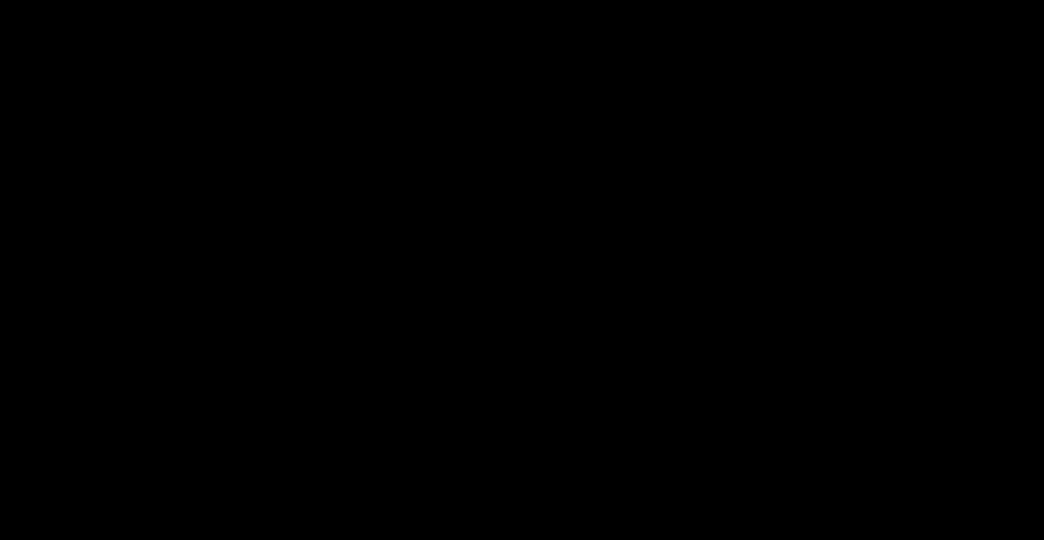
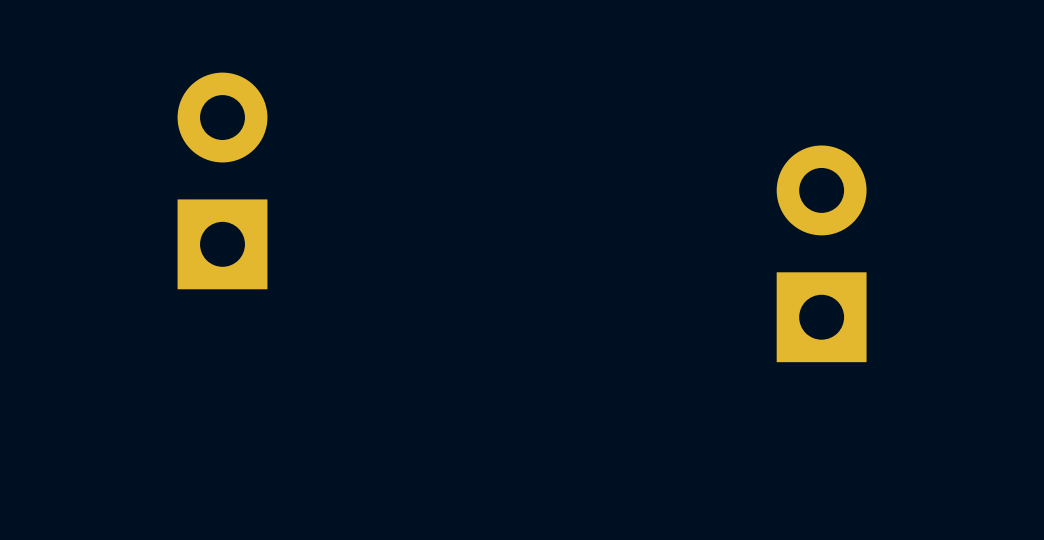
part: none -> (222, 180)
part: none -> (821, 253)

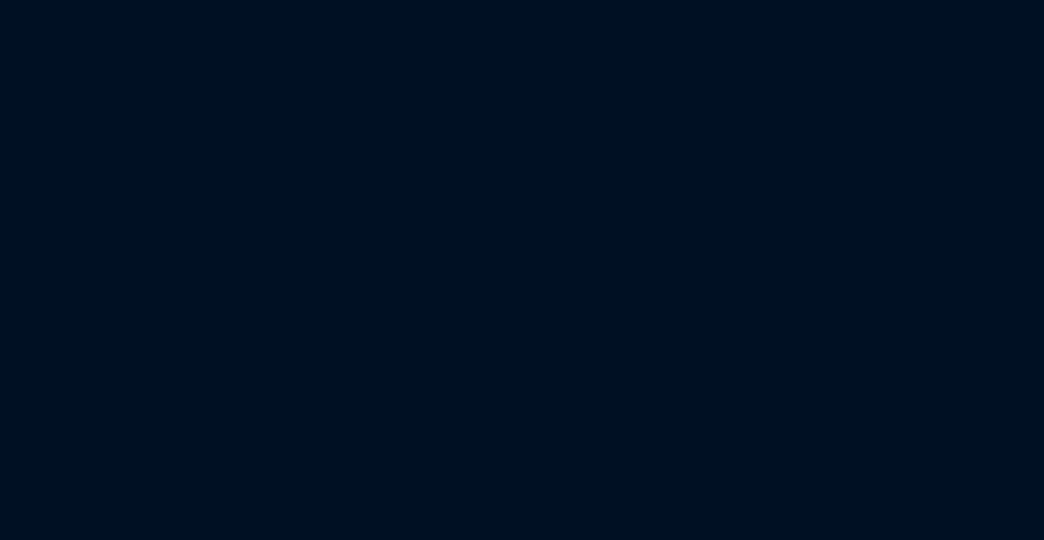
part: (222, 180) -> none
part: (821, 253) -> none

